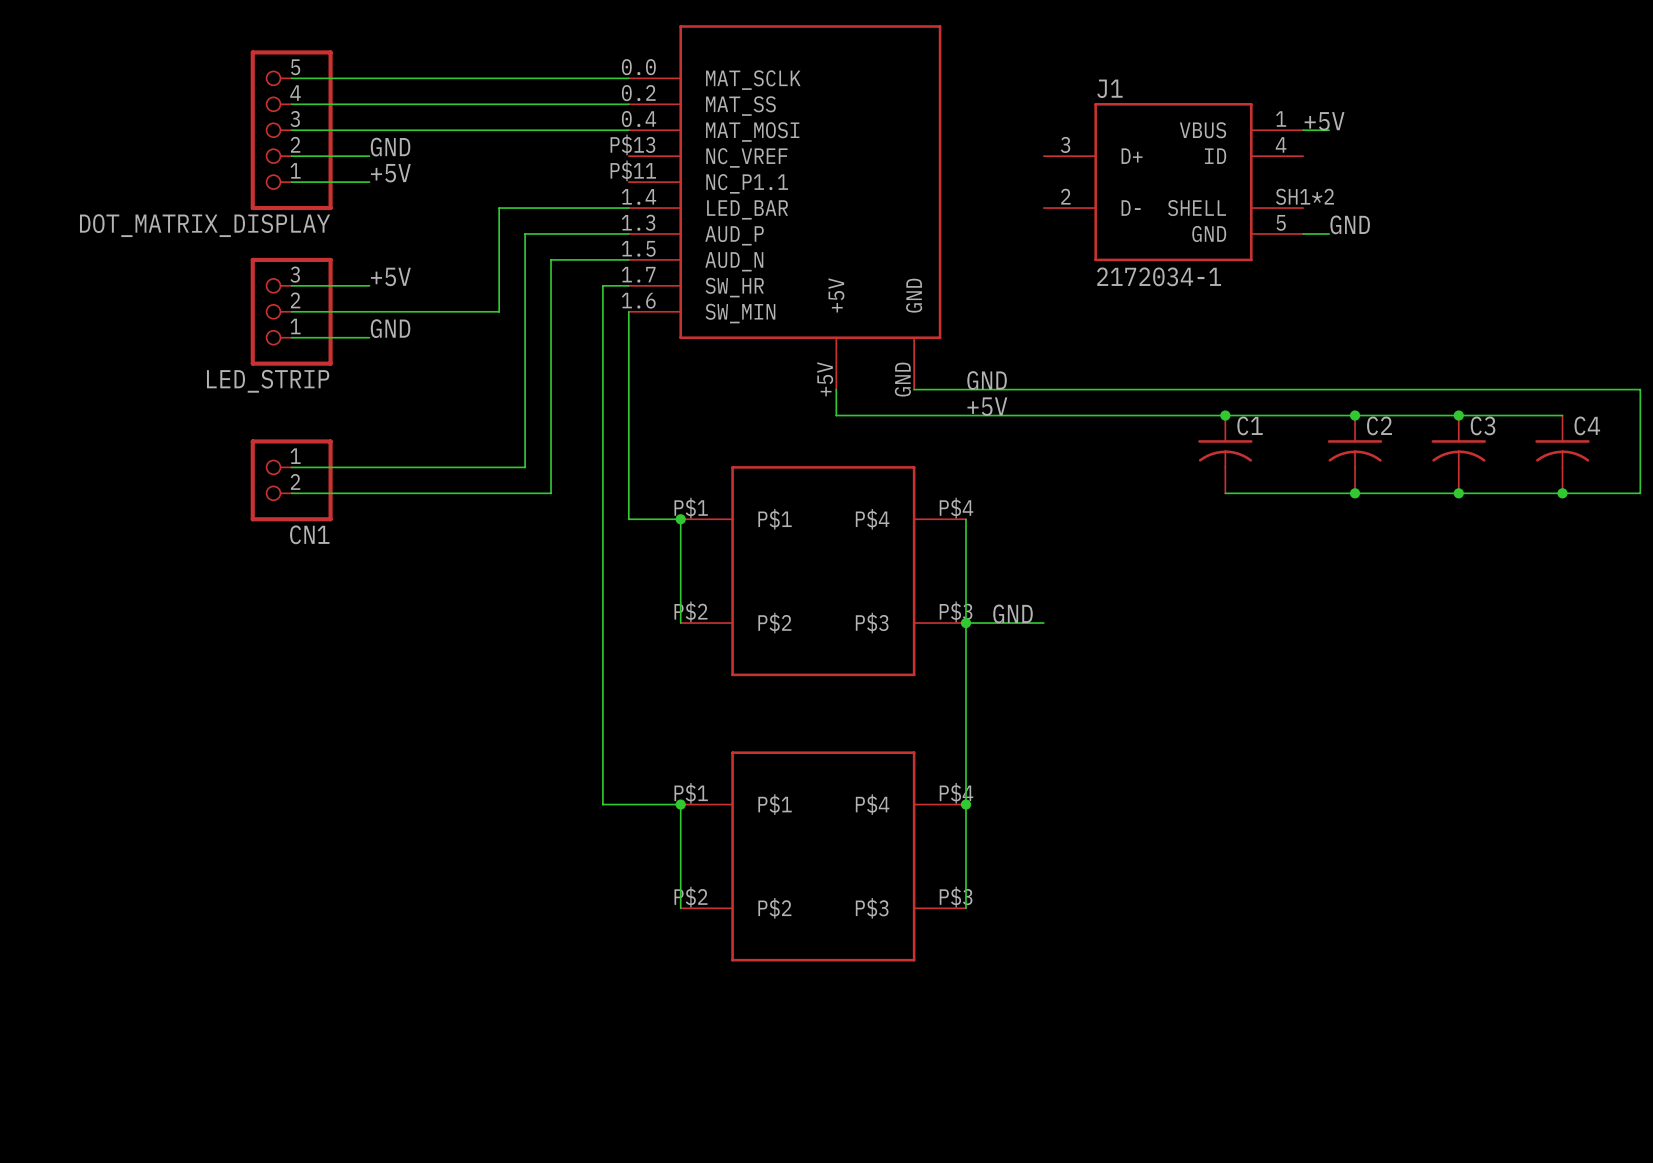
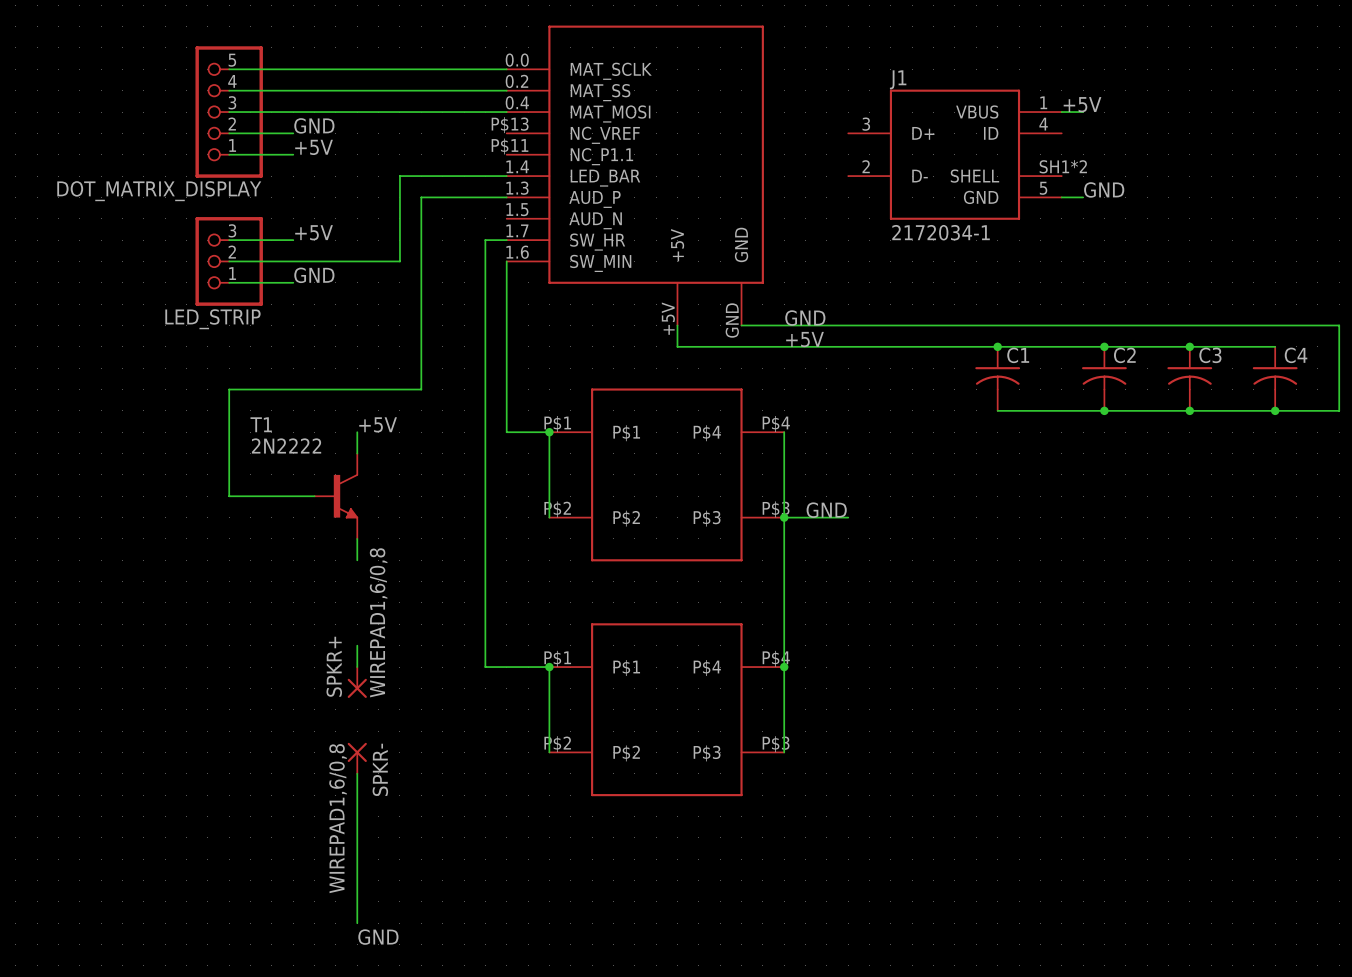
wire: (628, 259) (551, 259) (551, 493) (291, 493) -> none
wire: none -> (229, 389) (229, 496) (314, 496)
CN1: (291, 480) -> none
label: none -> +5V (378, 424)
wire: none -> (357, 432) (357, 453)
T1: none -> 2N2222 (336, 496)
wire: none -> (357, 538) (357, 560)
wire: none -> (357, 645) (357, 667)
SPKR+: none -> WIREPAD1,6/0,8 (357, 682)
SPKR-: none -> WIREPAD1,6/0,8 (357, 758)
wire: none -> (357, 773) (357, 923)
label: none -> GND (378, 937)

